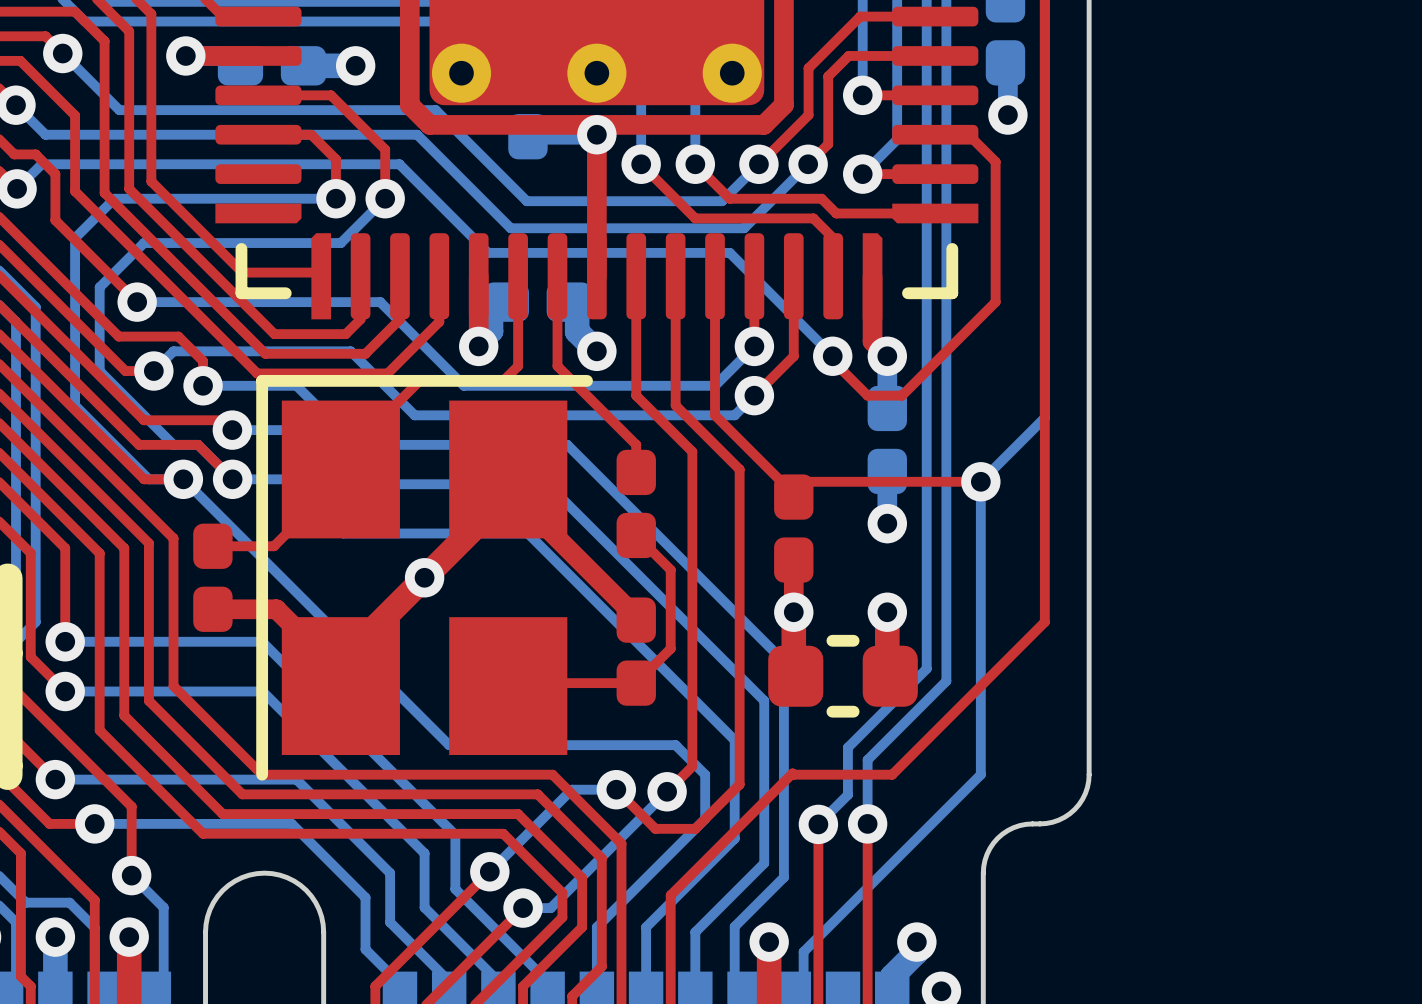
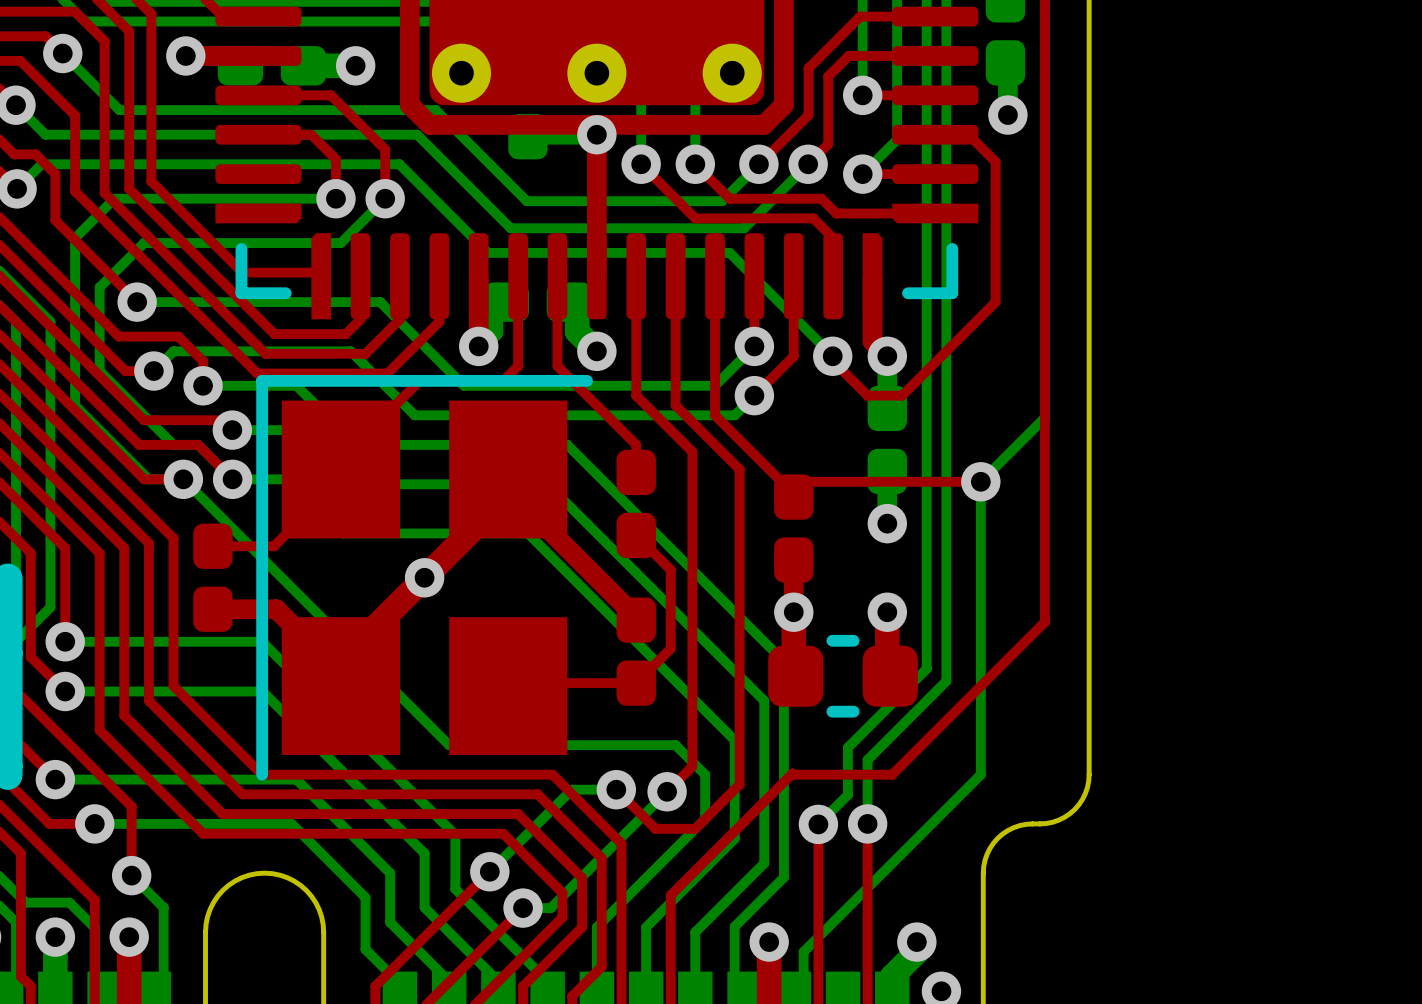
bottom track: (35, 307) (35, 622) -> (35, 307) (50, 321) (50, 607) (35, 622)

